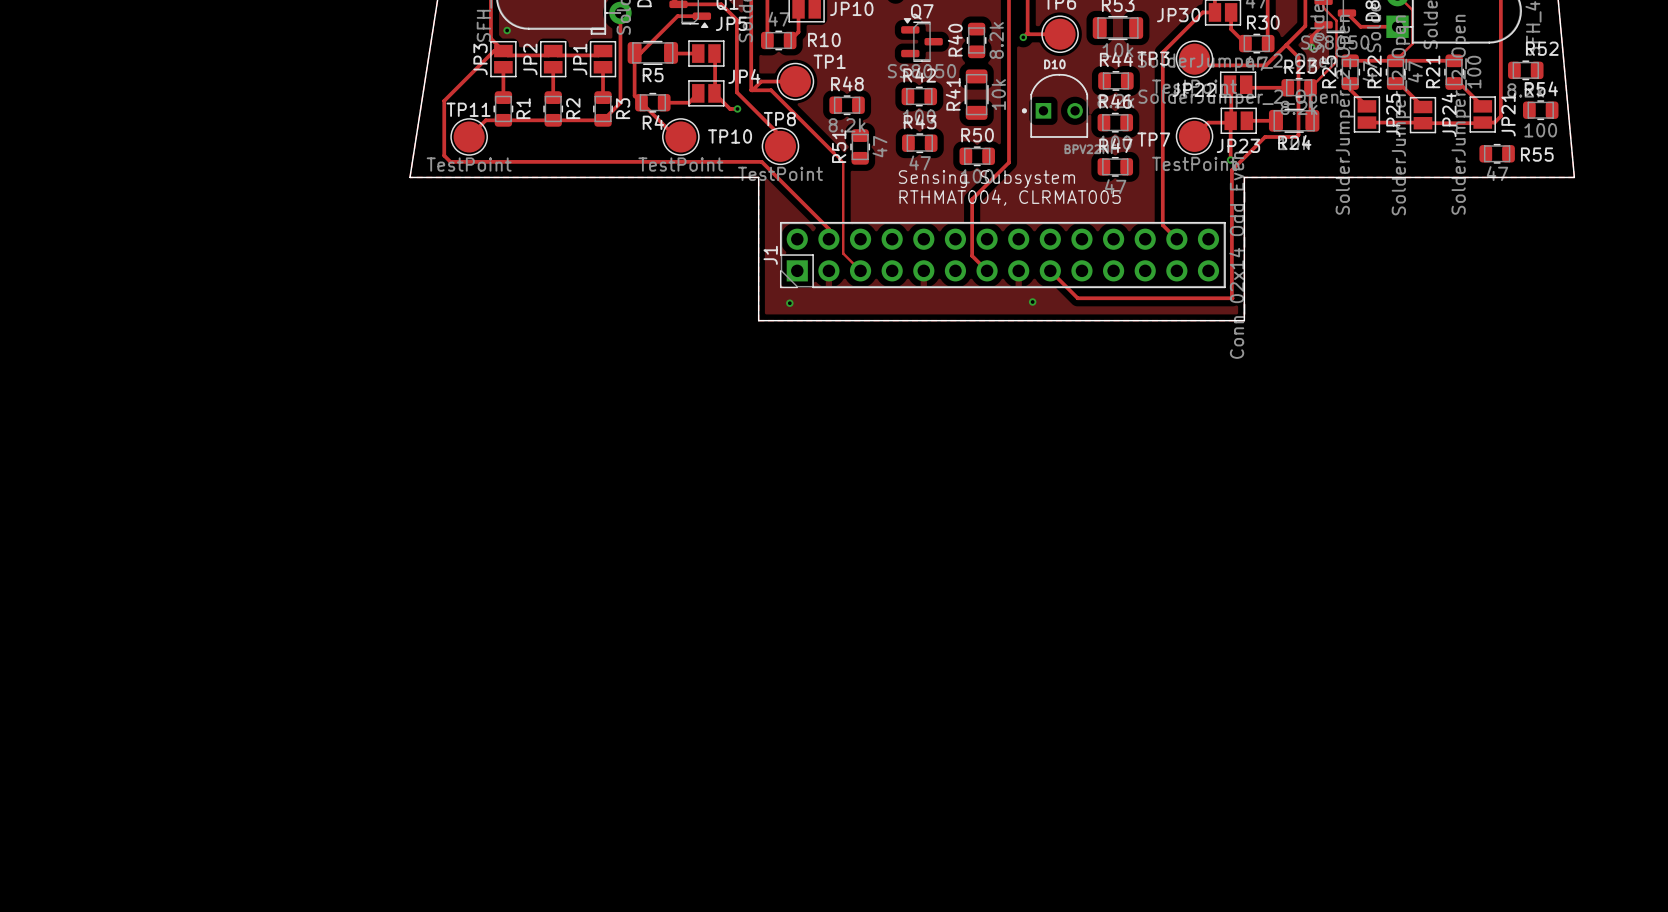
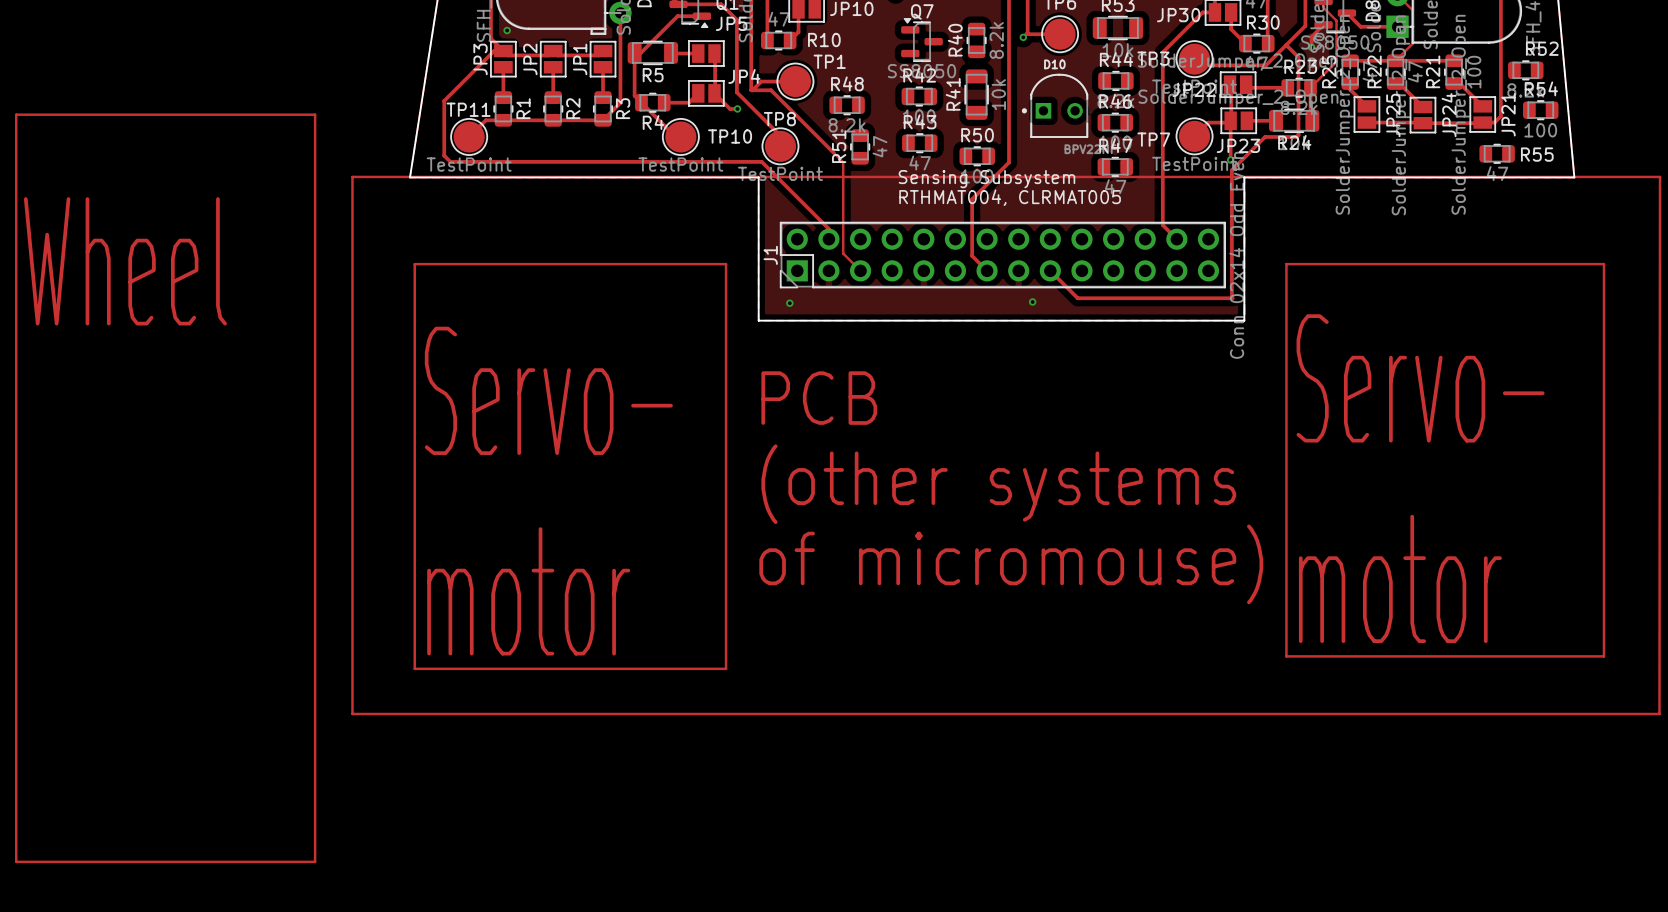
track: none -> (16, 114) (315, 114) (315, 861) (16, 861) (16, 114)
track: none -> (352, 176) (1660, 176) (1659, 713) (352, 713) (352, 176)
text: none -> Wheel (125, 261)
track: none -> (414, 264) (726, 264) (726, 668) (414, 668) (414, 264)
track: none -> (1286, 264) (1604, 264) (1604, 656) (1286, 656) (1286, 264)
text: none -> Servo- (1420, 378)
text: none -> Servo- (548, 390)
text: none -> PCB (819, 398)
text: none -> (other systems (998, 484)
text: none -> of micromouse) (1011, 564)
text: none -> motor (1400, 578)
text: none -> motor (528, 591)

